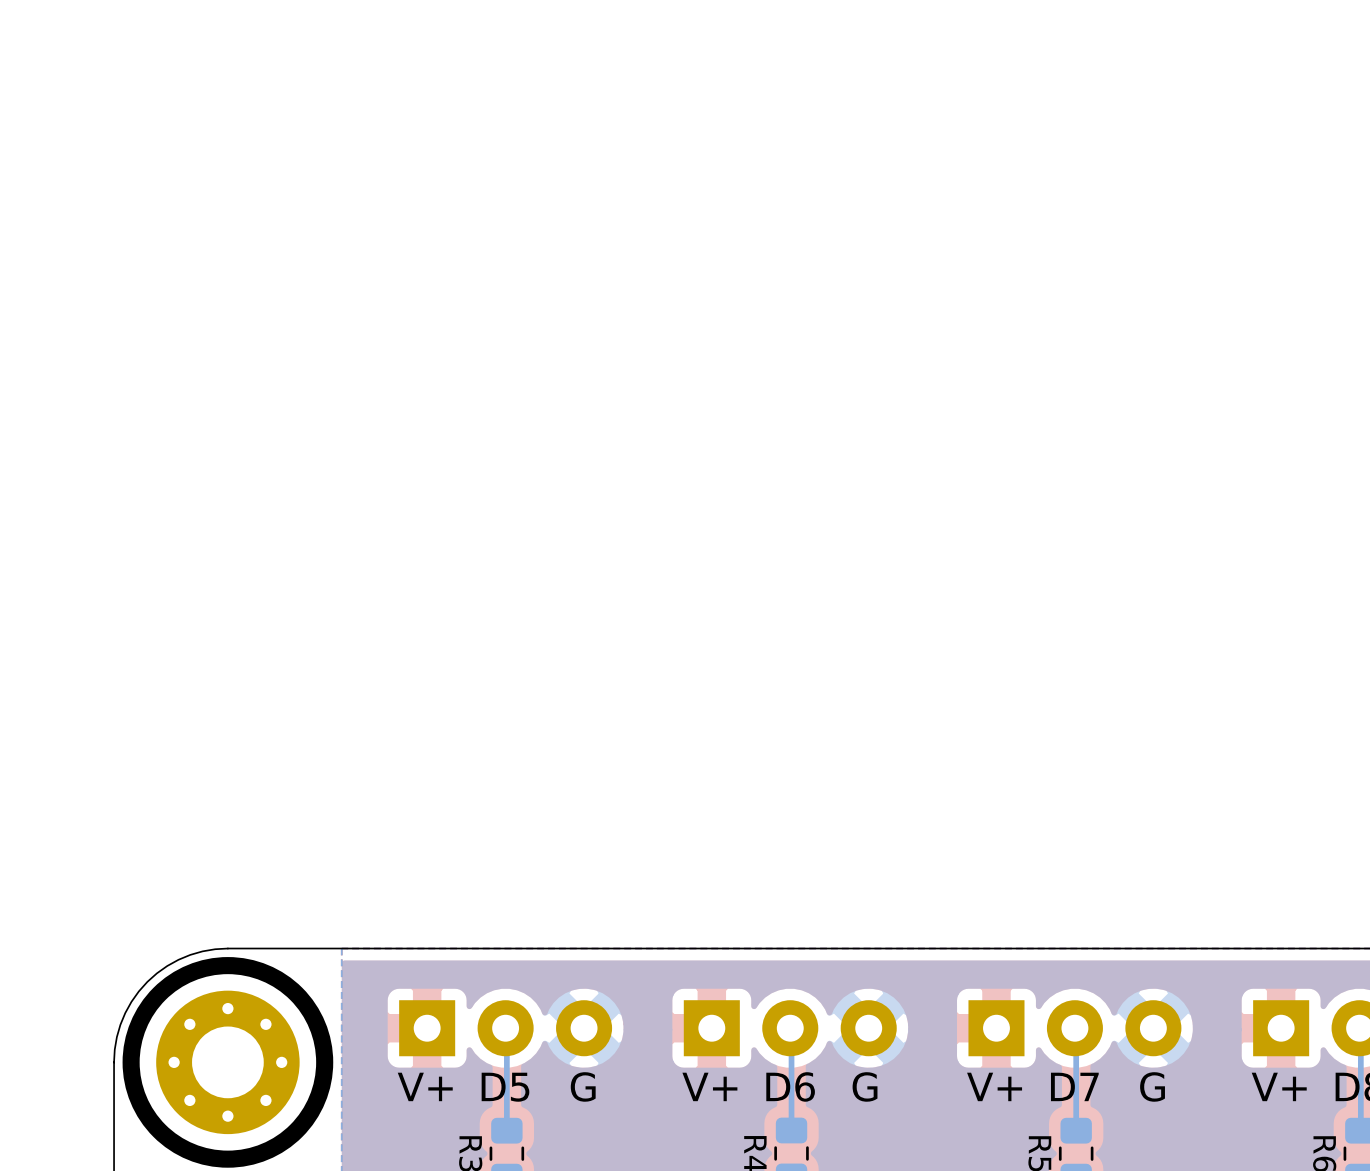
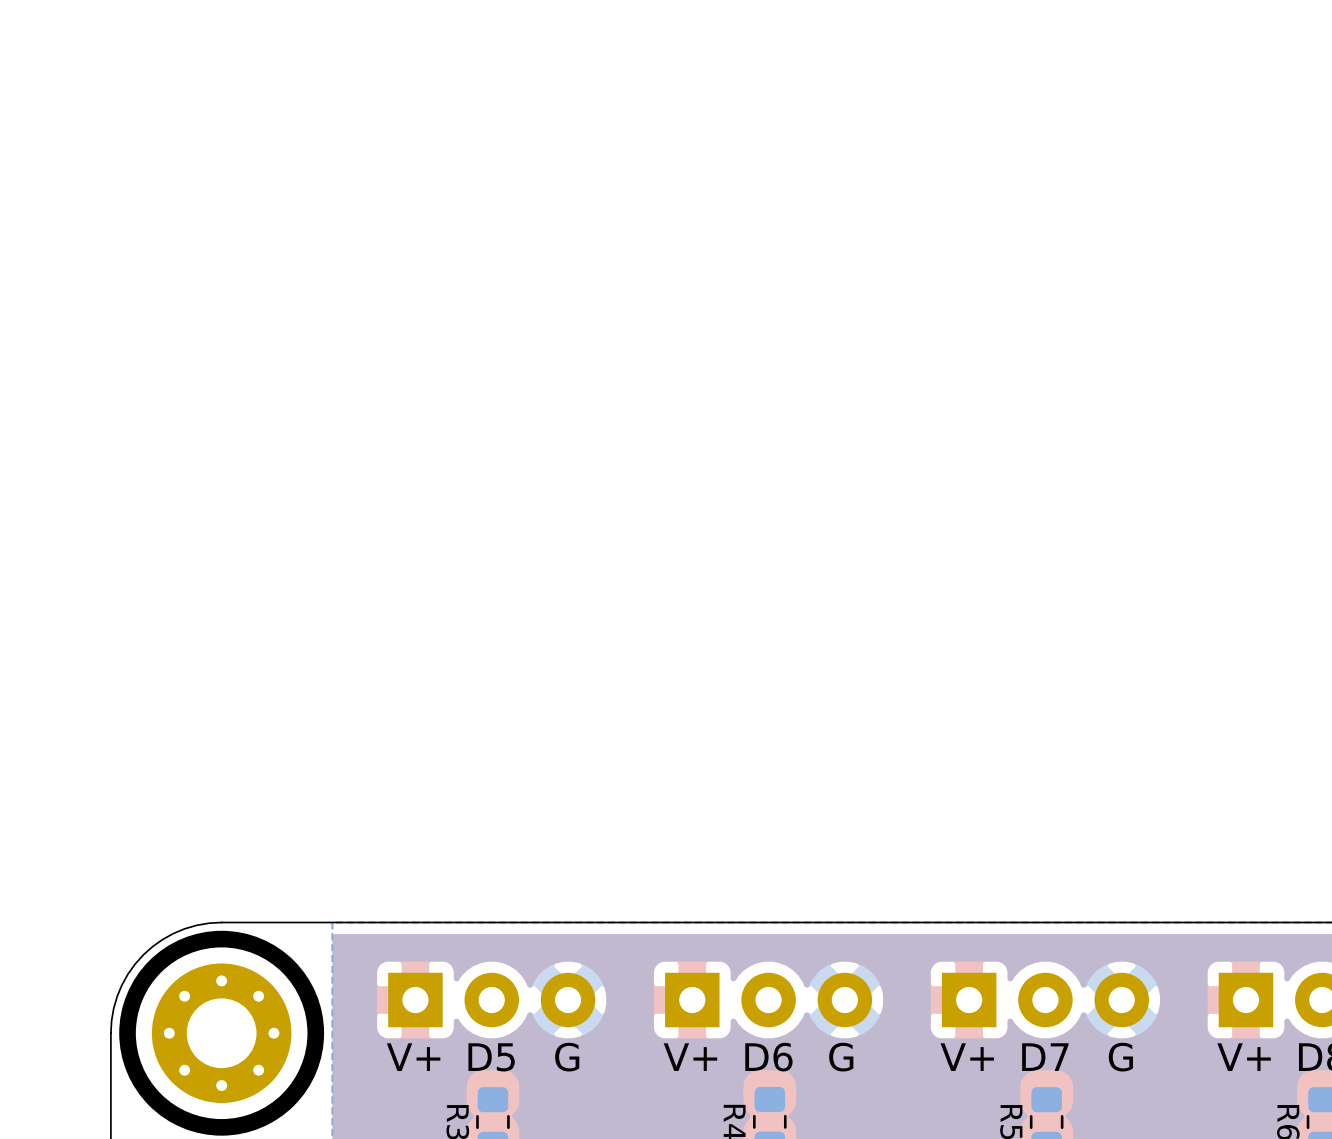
bottom track: (505, 1028) (506, 1130) -> none
bottom track: (790, 1028) (791, 1124) -> none
bottom track: (1074, 1028) (1076, 1130) -> none
bottom track: (1359, 1028) (1360, 1130) -> none

